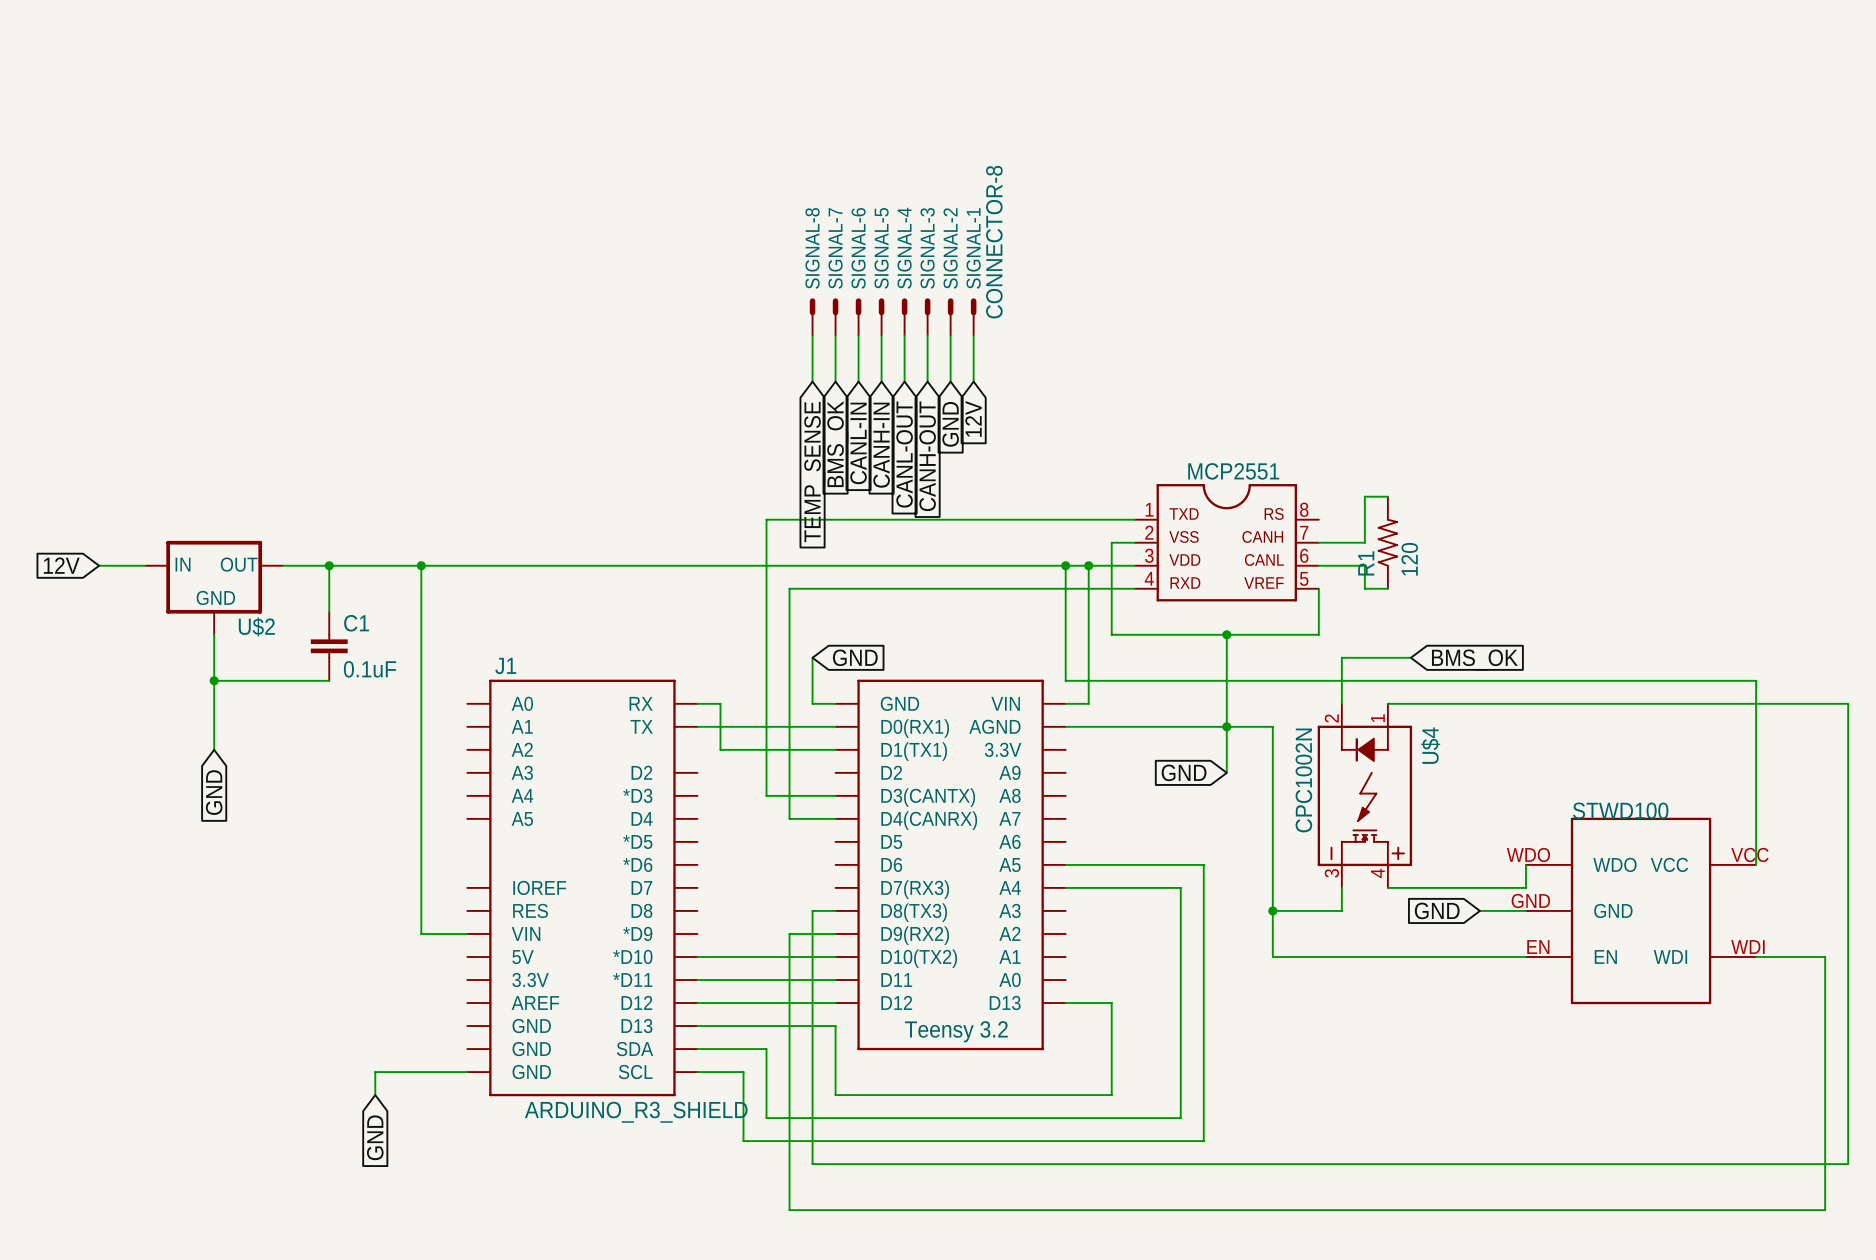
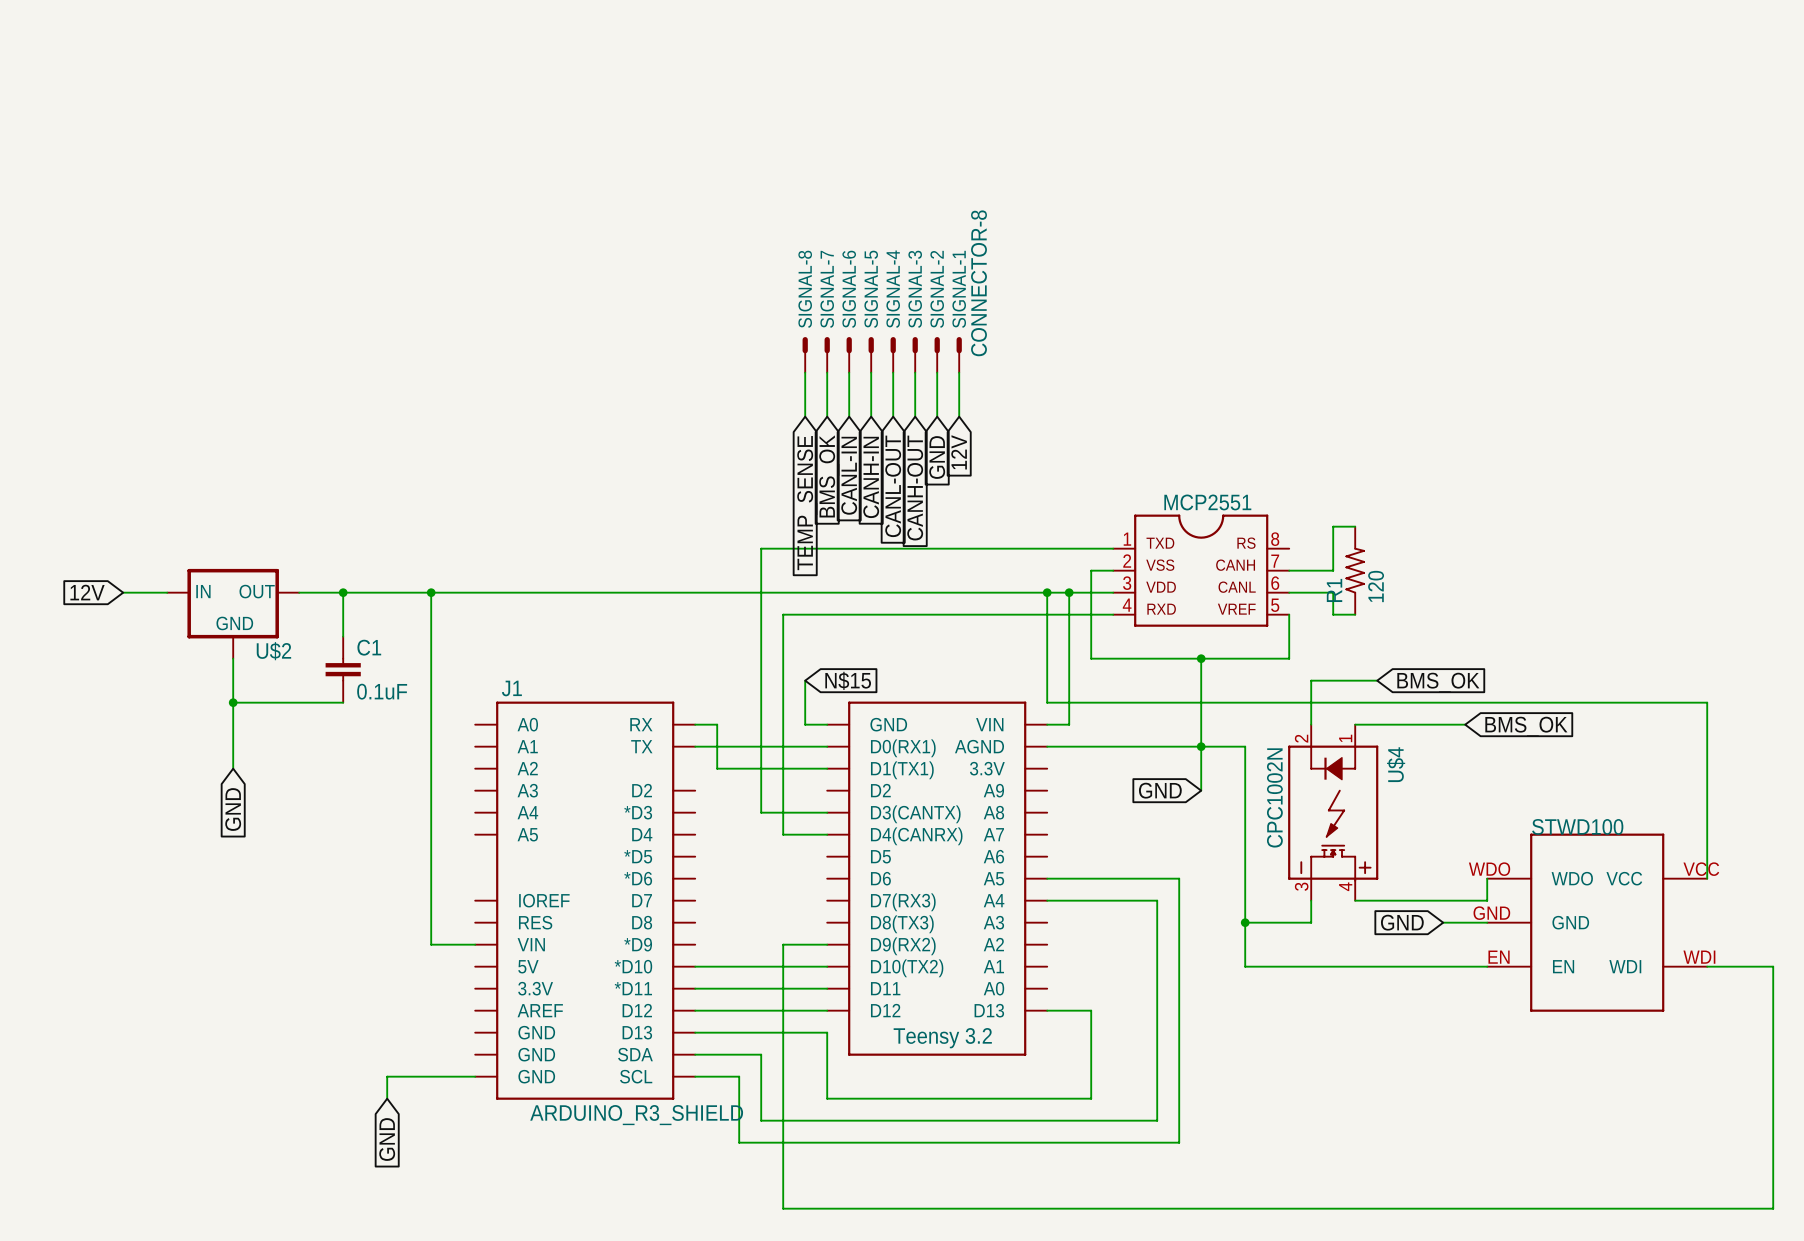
global label: GND (855, 657) -> N$15 (848, 680)
wire: (1502, 703) (1848, 703) (1848, 1164) (812, 1164) (812, 910) (835, 910) -> none
global label: none -> BMS_OK (1526, 726)

